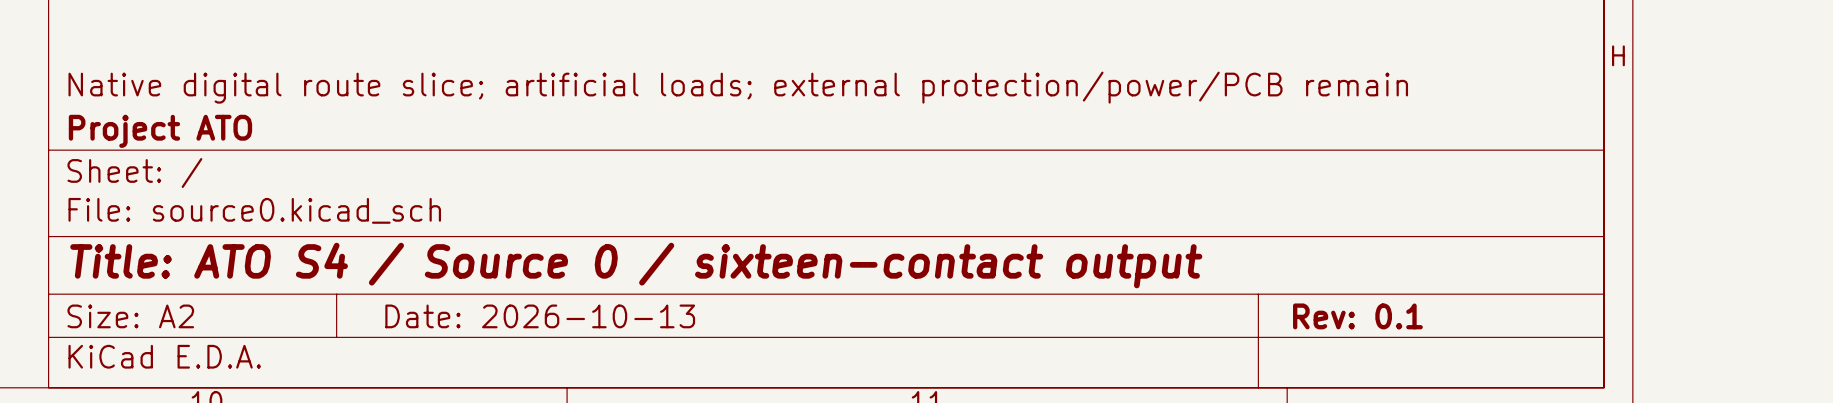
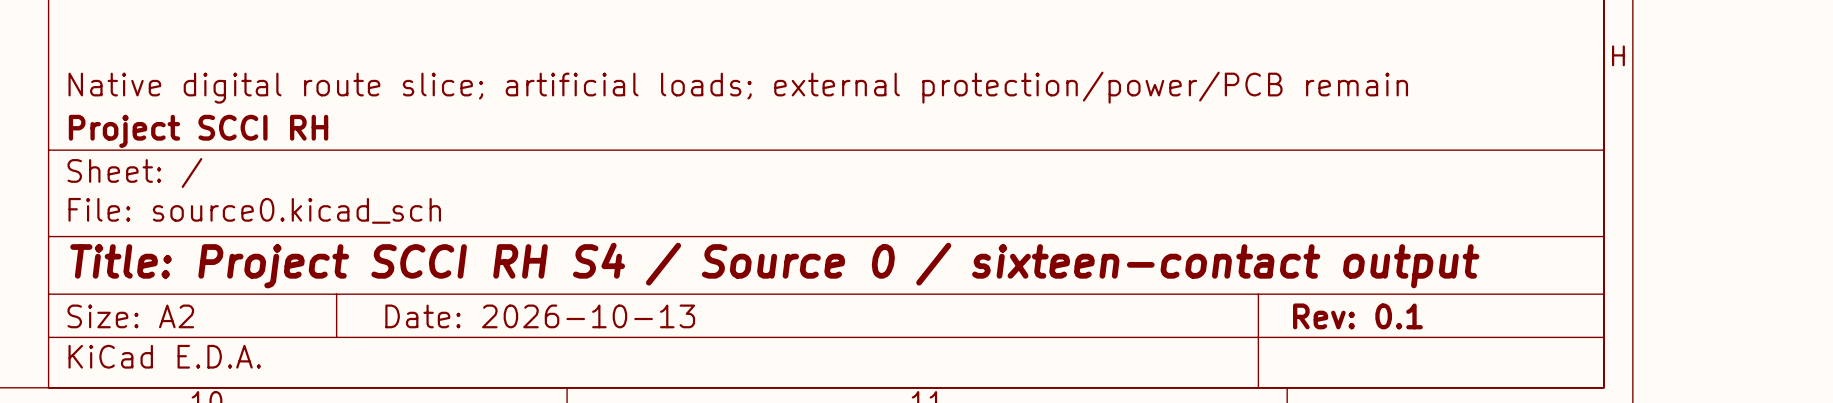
title block: Project ATO (160, 131) -> Project SCCI RH (198, 131)
title block: Title: ATO S4 / Source 0 / sixteen-contact output (636, 265) -> Title: Project SCCI RH S4 / Source 0 / sixteen-contact output (774, 265)

